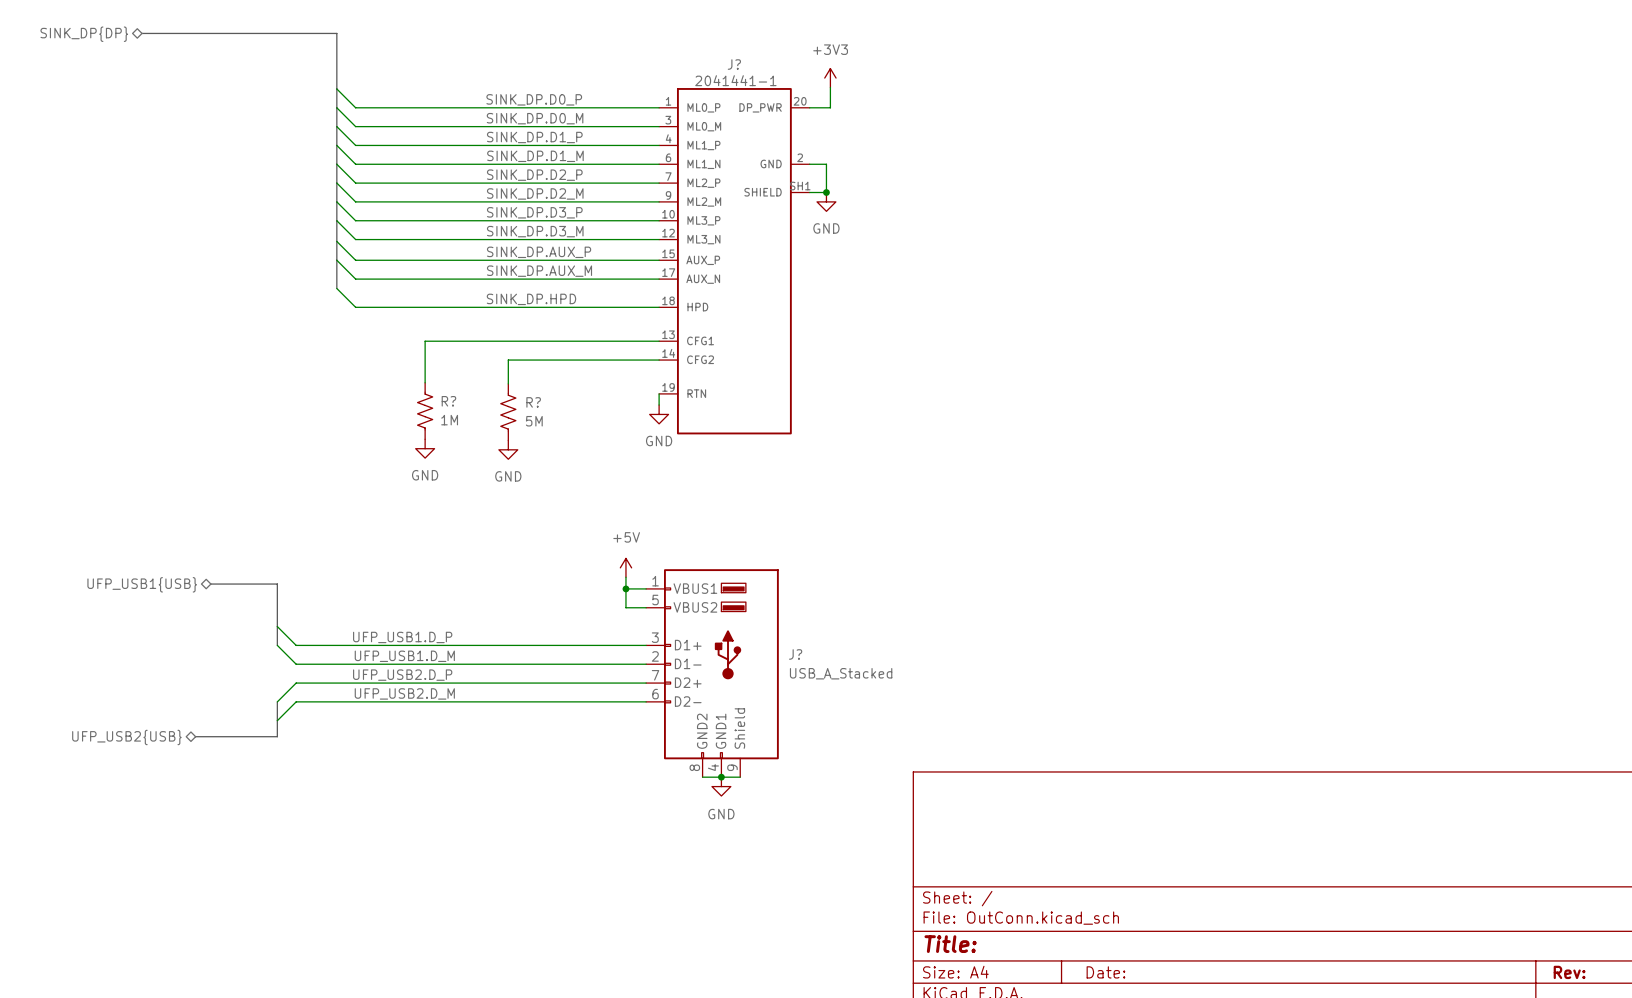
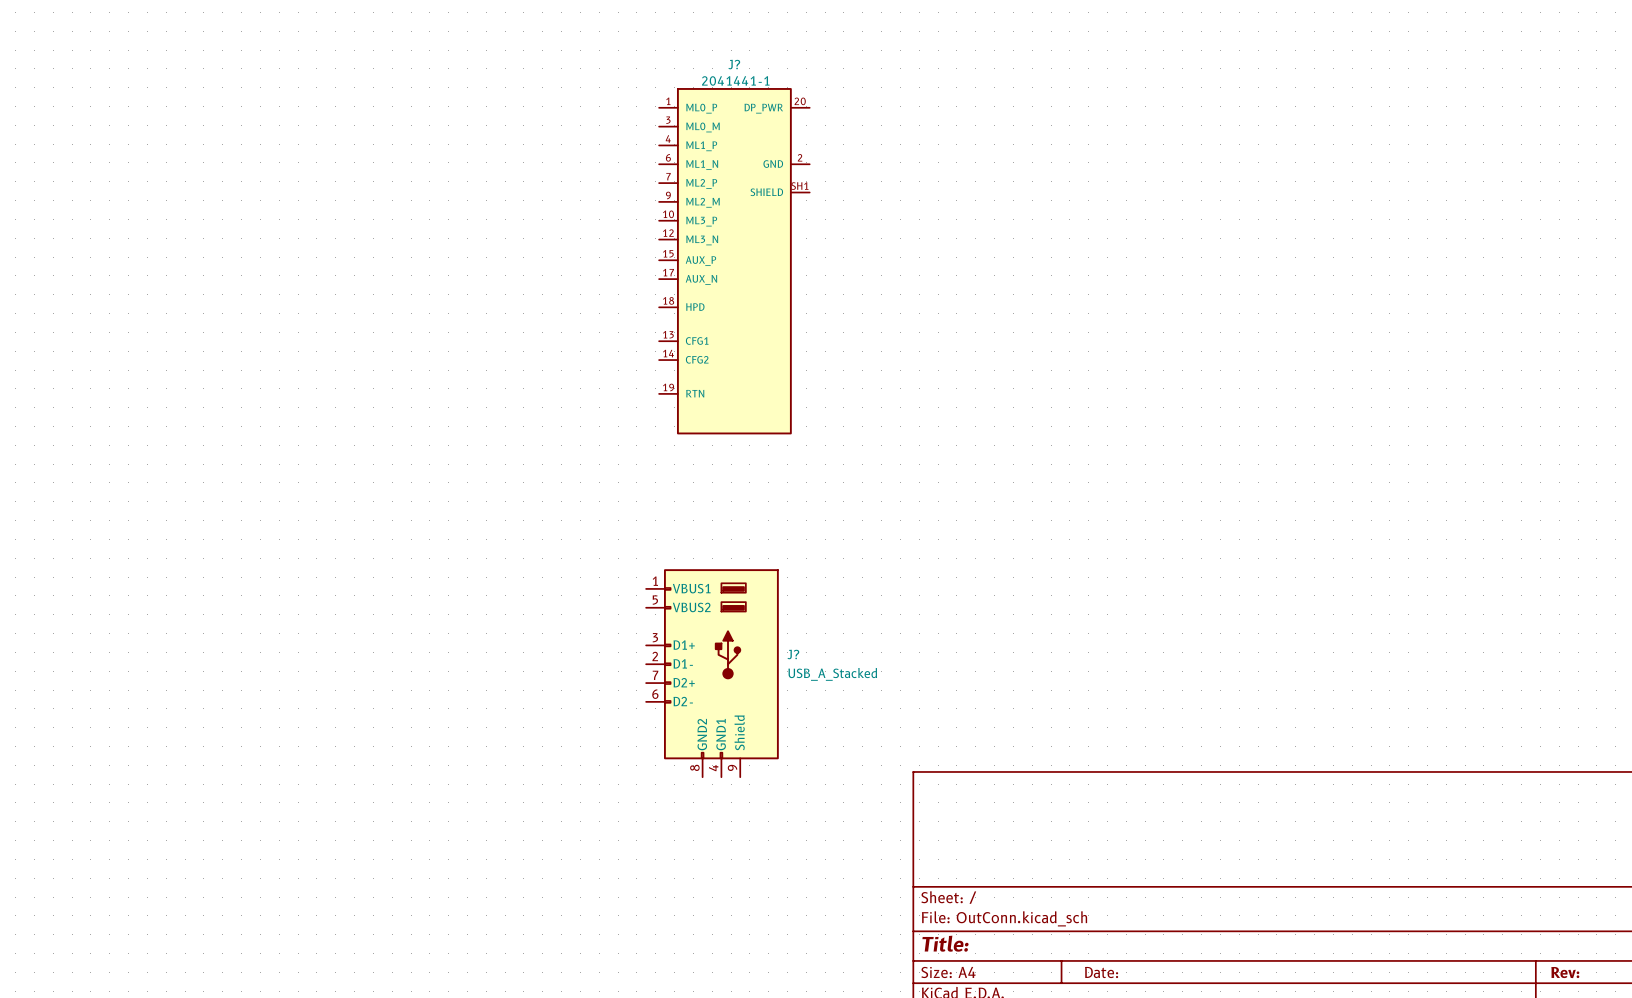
bus: (141, 33) (336, 33) (336, 288) -> none
hierarchical label: SINK_DP{DP} (84, 34) -> none
power symbol: +3V3 (830, 78) -> none
wire: (830, 87) (830, 107) (809, 107) -> none
wire: (336, 88) (355, 107) (659, 107) -> none
label: SINK_DP.D0_P (534, 99) -> none
wire: (336, 107) (355, 126) (659, 126) -> none
label: SINK_DP.D0_M (535, 118) -> none
wire: (336, 126) (355, 145) (659, 145) -> none
label: SINK_DP.D1_P (534, 137) -> none
wire: (336, 145) (355, 164) (659, 164) -> none
label: SINK_DP.D1_M (535, 156) -> none
wire: (336, 164) (355, 183) (659, 183) -> none
wire: (809, 164) (826, 164) (826, 192) (809, 192) -> none
label: SINK_DP.D2_P (534, 175) -> none
wire: (336, 183) (355, 201) (659, 201) -> none
junction: (826, 192) -> none
label: SINK_DP.D2_M (535, 193) -> none
wire: (336, 201) (355, 220) (659, 220) -> none
power symbol: GND (826, 201) -> none
label: SINK_DP.D3_P (534, 212) -> none
wire: (336, 220) (355, 239) (659, 239) -> none
label: SINK_DP.D3_M (535, 231) -> none
wire: (336, 241) (355, 260) (659, 260) -> none
label: SINK_DP.AUX_P (539, 252) -> none
wire: (336, 260) (355, 279) (659, 279) -> none
label: SINK_DP.AUX_M (539, 271) -> none
wire: (336, 288) (355, 307) (659, 307) -> none
label: SINK_DP.HPD (531, 299) -> none
wire: (659, 341) (425, 341) (425, 382) -> none
wire: (659, 360) (508, 360) (508, 383) -> none
wire: (659, 393) (659, 405) -> none
R?: 1M (425, 411) -> none
R?: 5M (508, 412) -> none
power symbol: GND (659, 414) -> none
power symbol: GND (425, 448) -> none
power symbol: GND (508, 449) -> none
power symbol: +5V (625, 567) -> none
wire: (625, 577) (625, 607) (646, 607) -> none
hierarchical label: UFP_USB1{USB} (142, 584) -> none
bus: (210, 584) (277, 584) (277, 645) -> none
wire: (625, 588) (646, 588) -> none
junction: (625, 588) -> none
wire: (277, 626) (296, 645) (646, 645) -> none
label: UFP_USB1.D_P (402, 637) -> none
wire: (277, 645) (296, 664) (646, 664) -> none
label: UFP_USB1.D_M (404, 656) -> none
label: UFP_USB2.D_P (402, 675) -> none
wire: (646, 683) (296, 683) (277, 701) -> none
label: UFP_USB2.D_M (404, 693) -> none
bus: (277, 701) (277, 736) (195, 736) -> none
wire: (646, 701) (296, 701) (277, 720) -> none
hierarchical label: UFP_USB2{USB} (126, 737) -> none
wire: (702, 777) (740, 777) -> none
junction: (721, 777) -> none
power symbol: GND (721, 786) -> none

